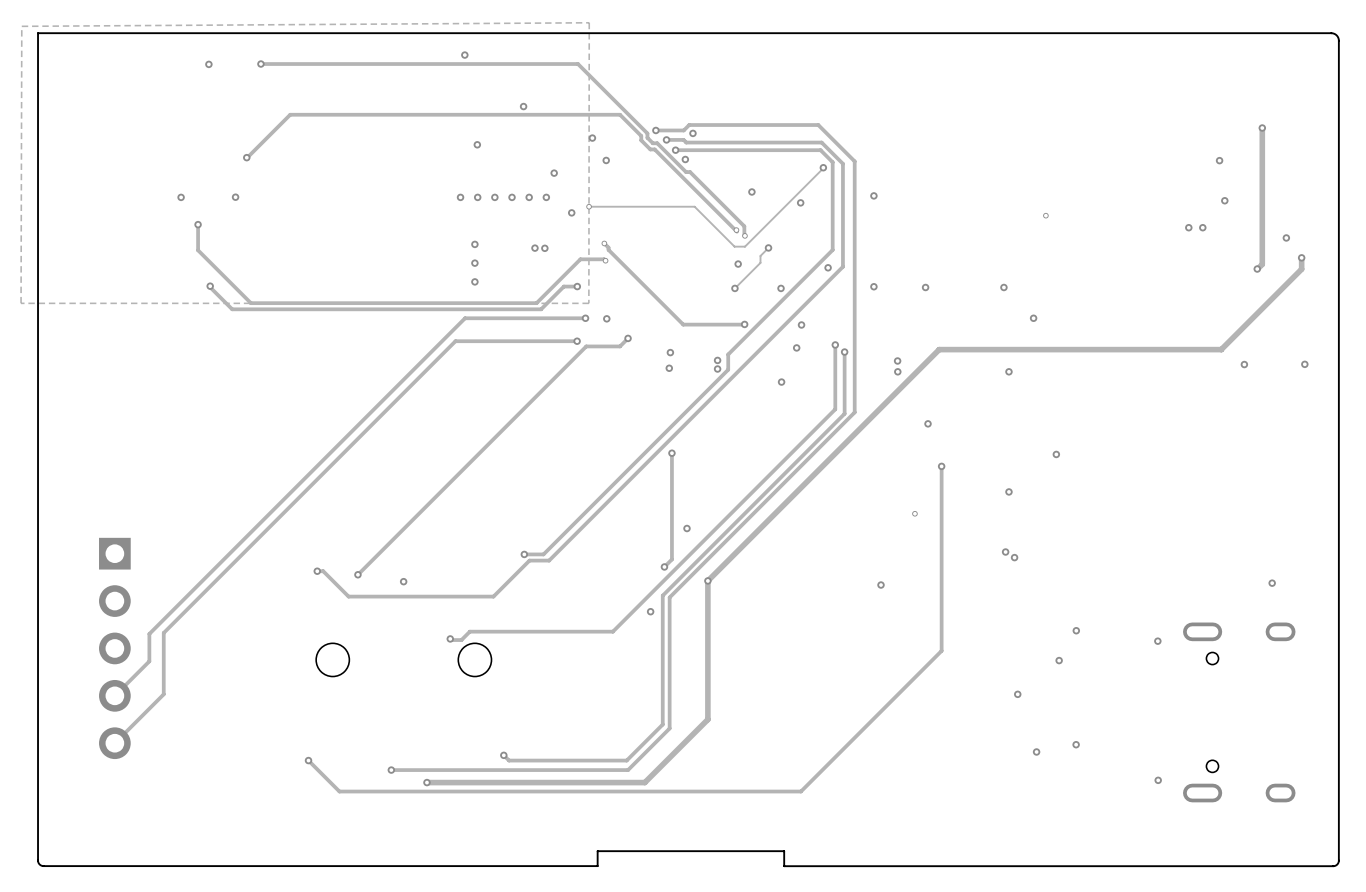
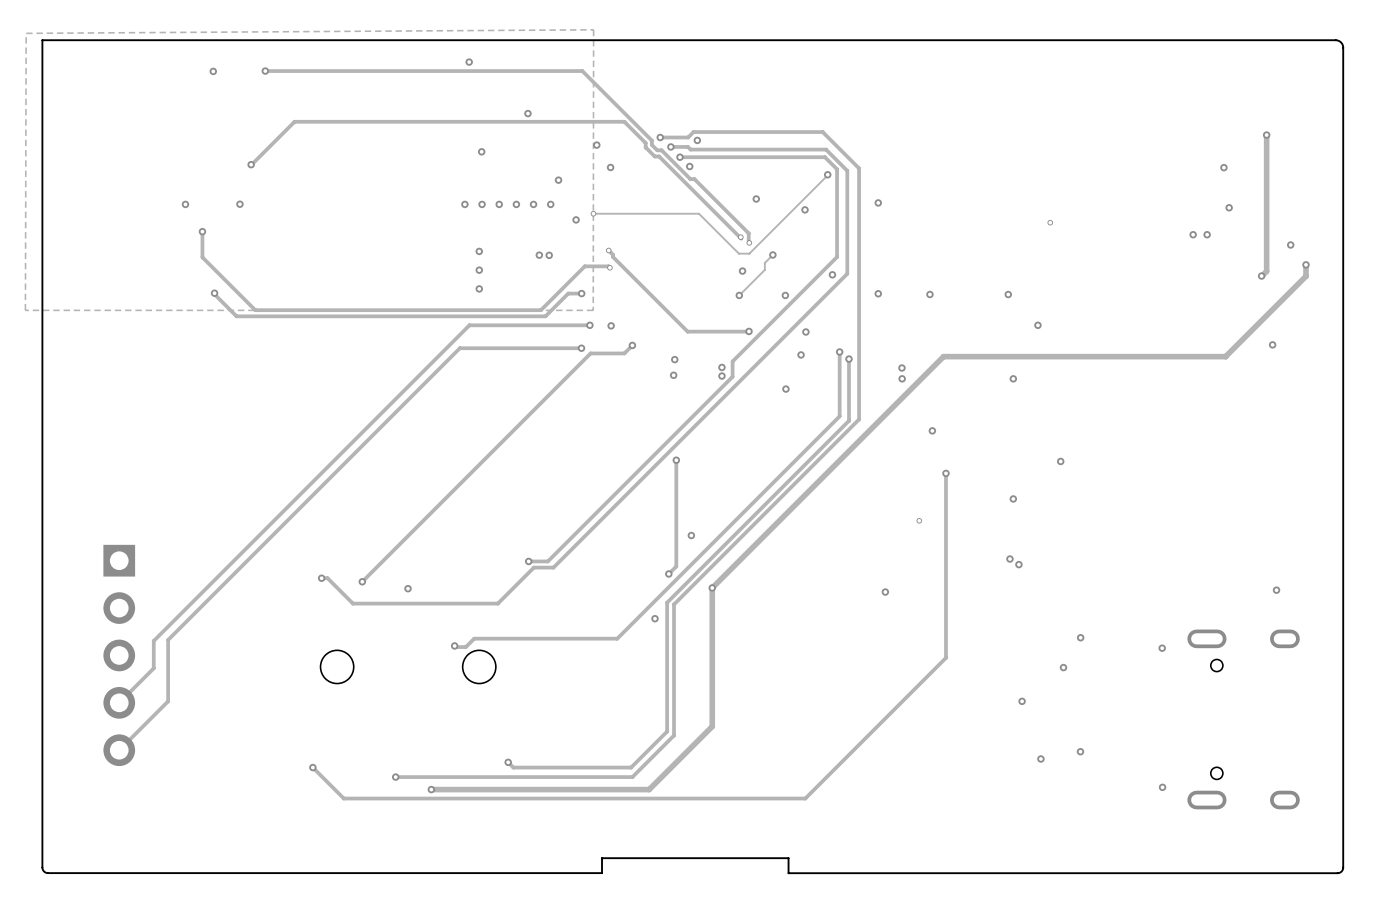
via: none -> (1272, 344)
via: (1244, 364) -> none
via: (1304, 364) -> none

